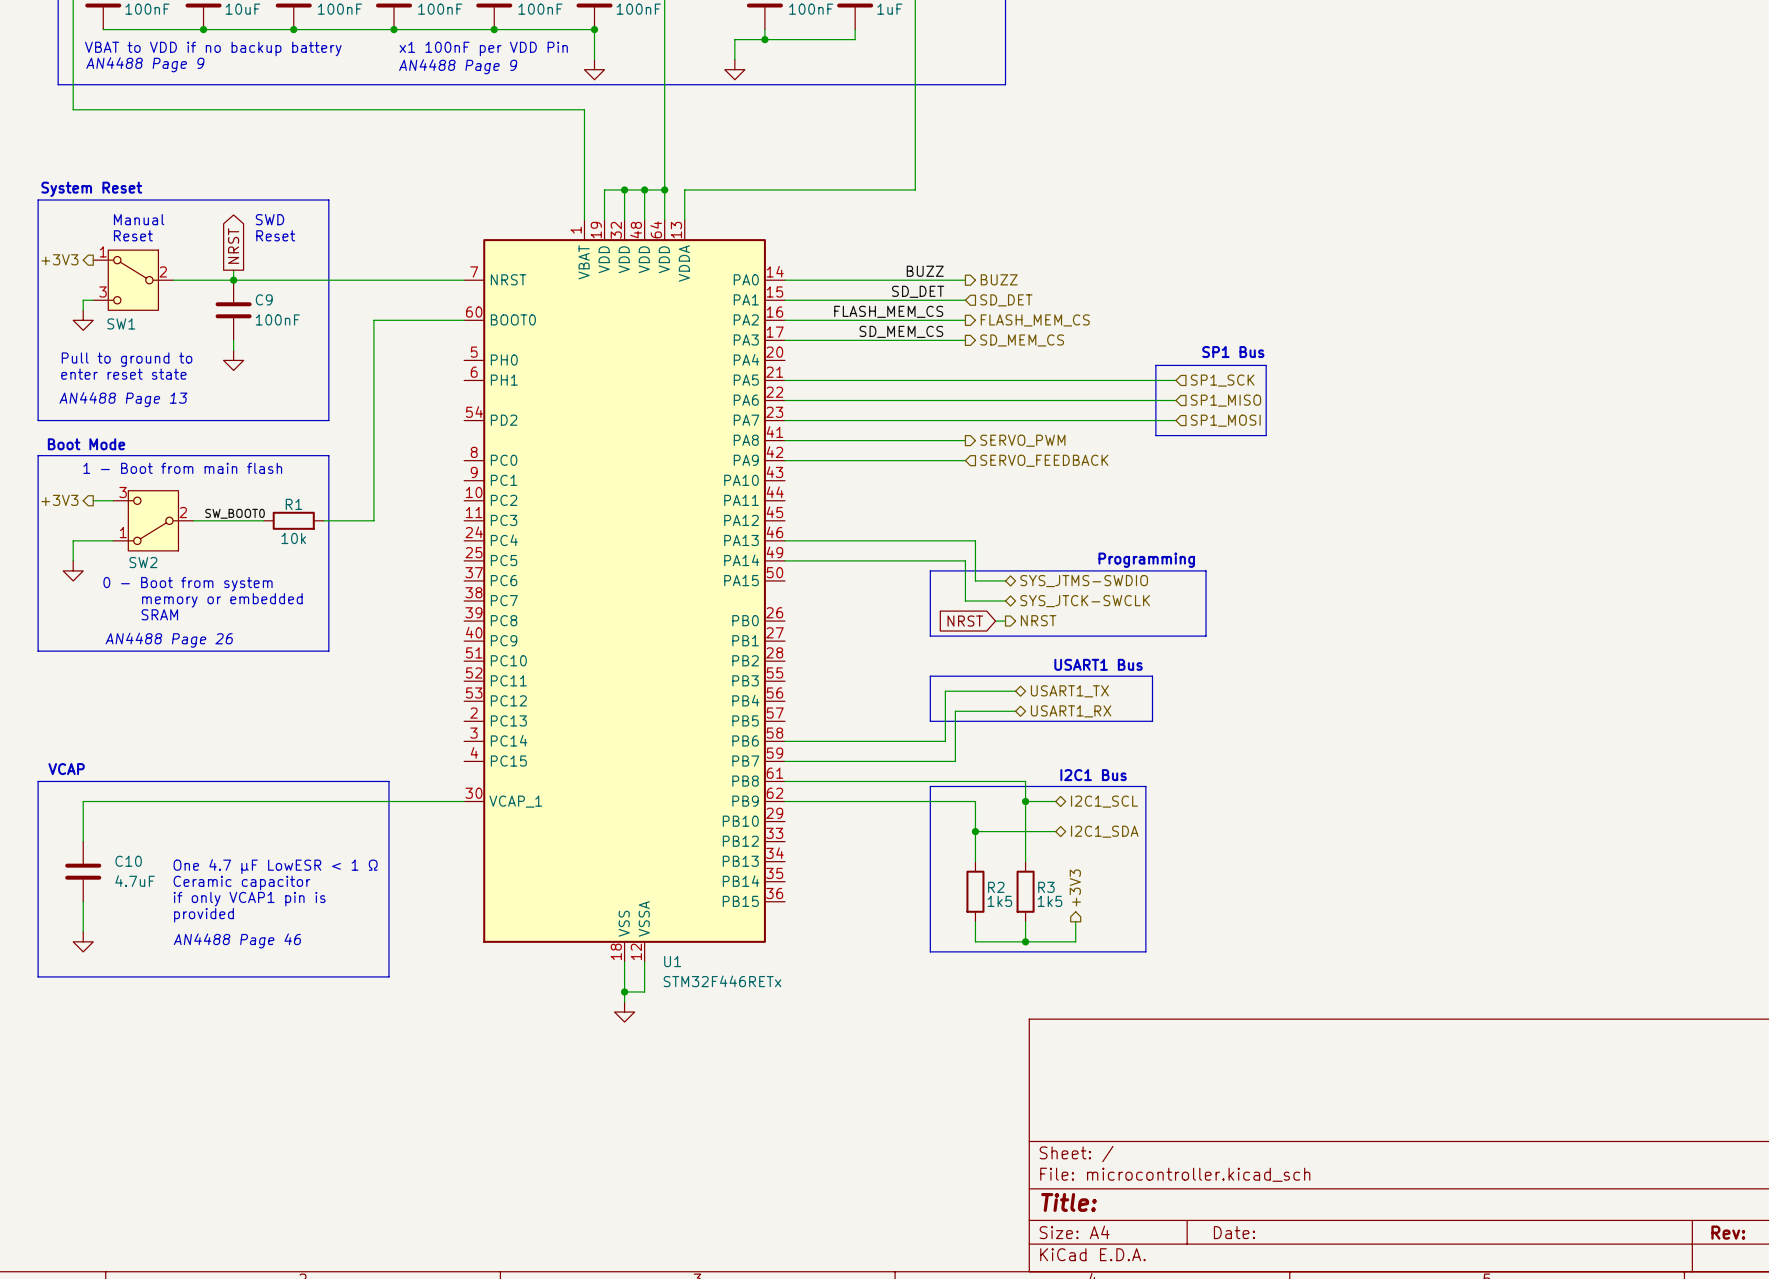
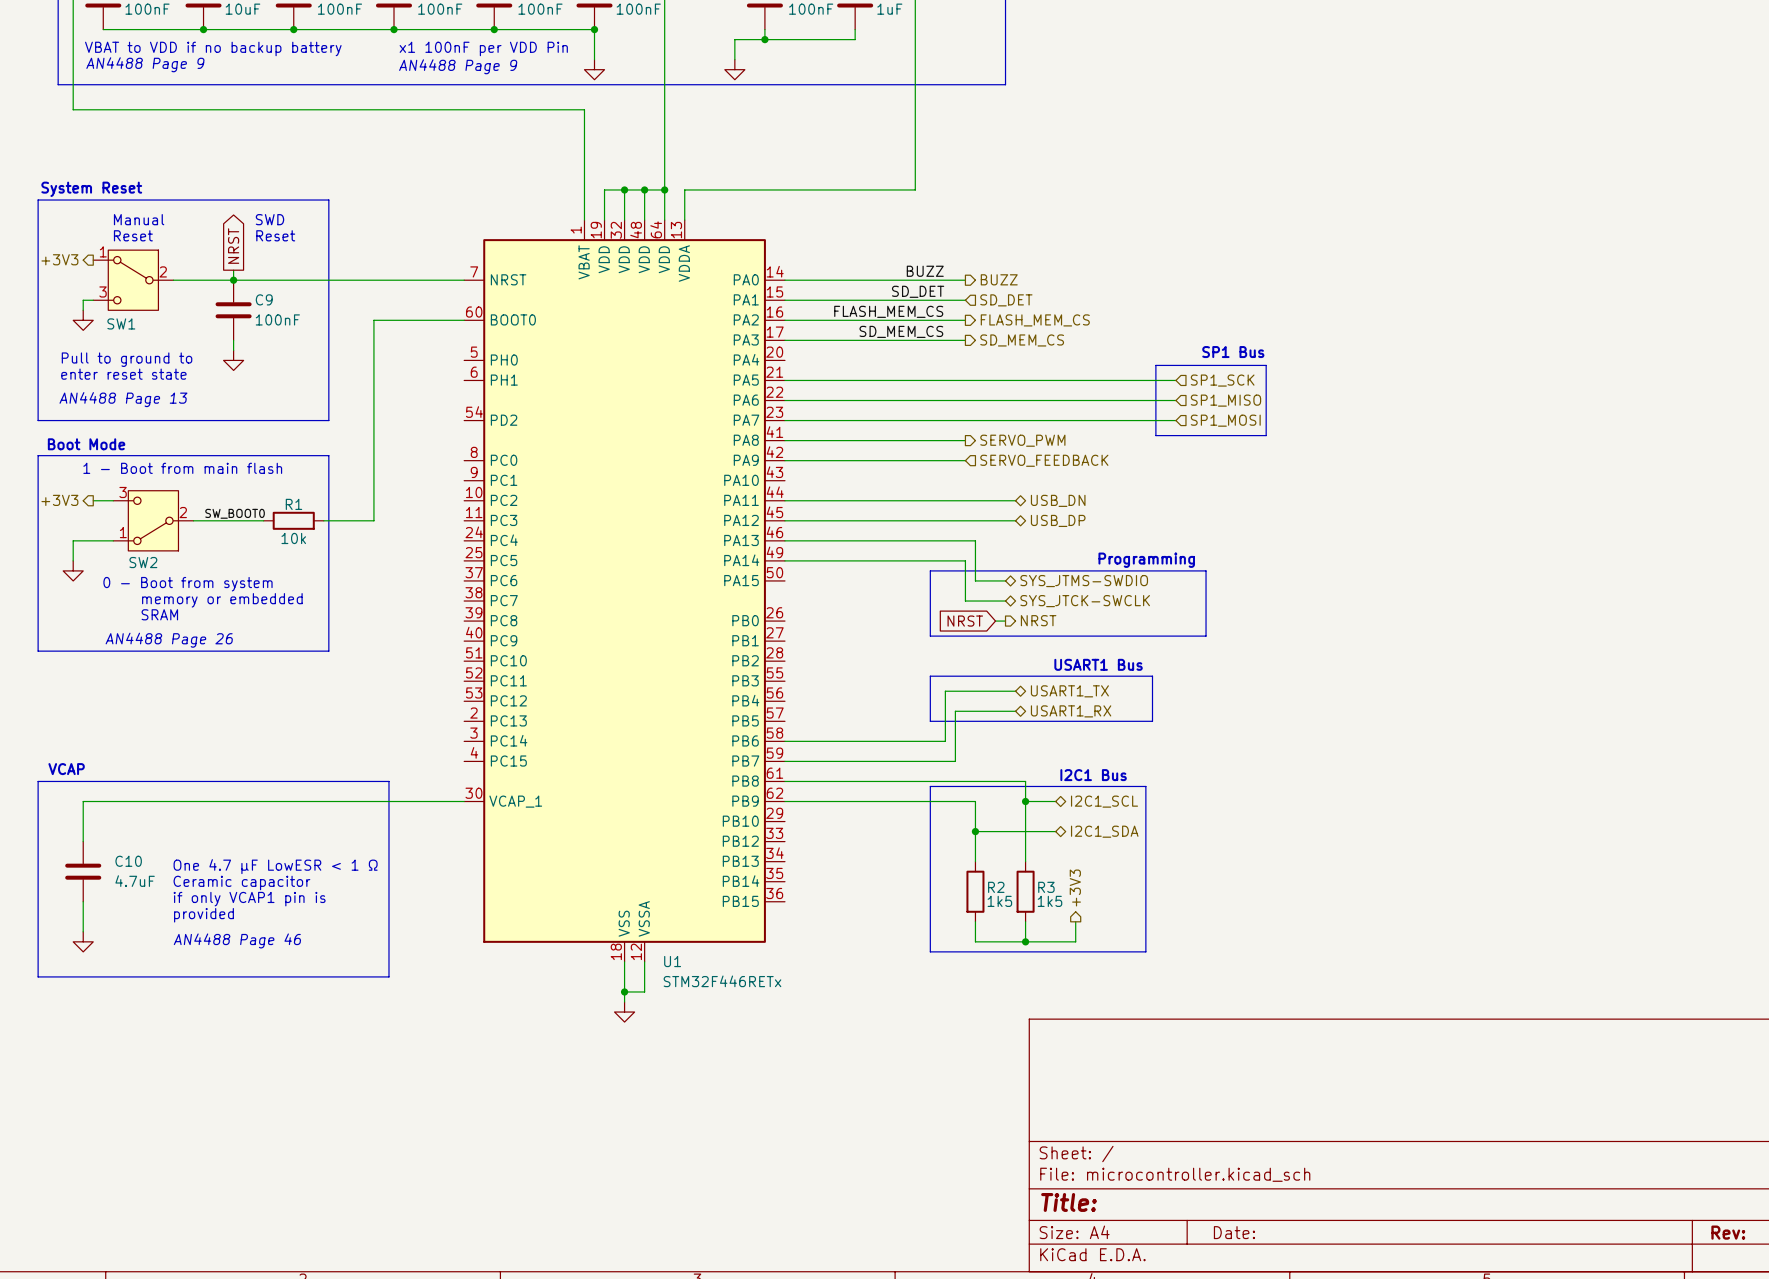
wire: none -> (784, 500) (1015, 500)
hierarchical label: none -> USB_DN (1058, 500)
wire: none -> (784, 520) (1015, 520)
hierarchical label: none -> USB_DP (1058, 520)

